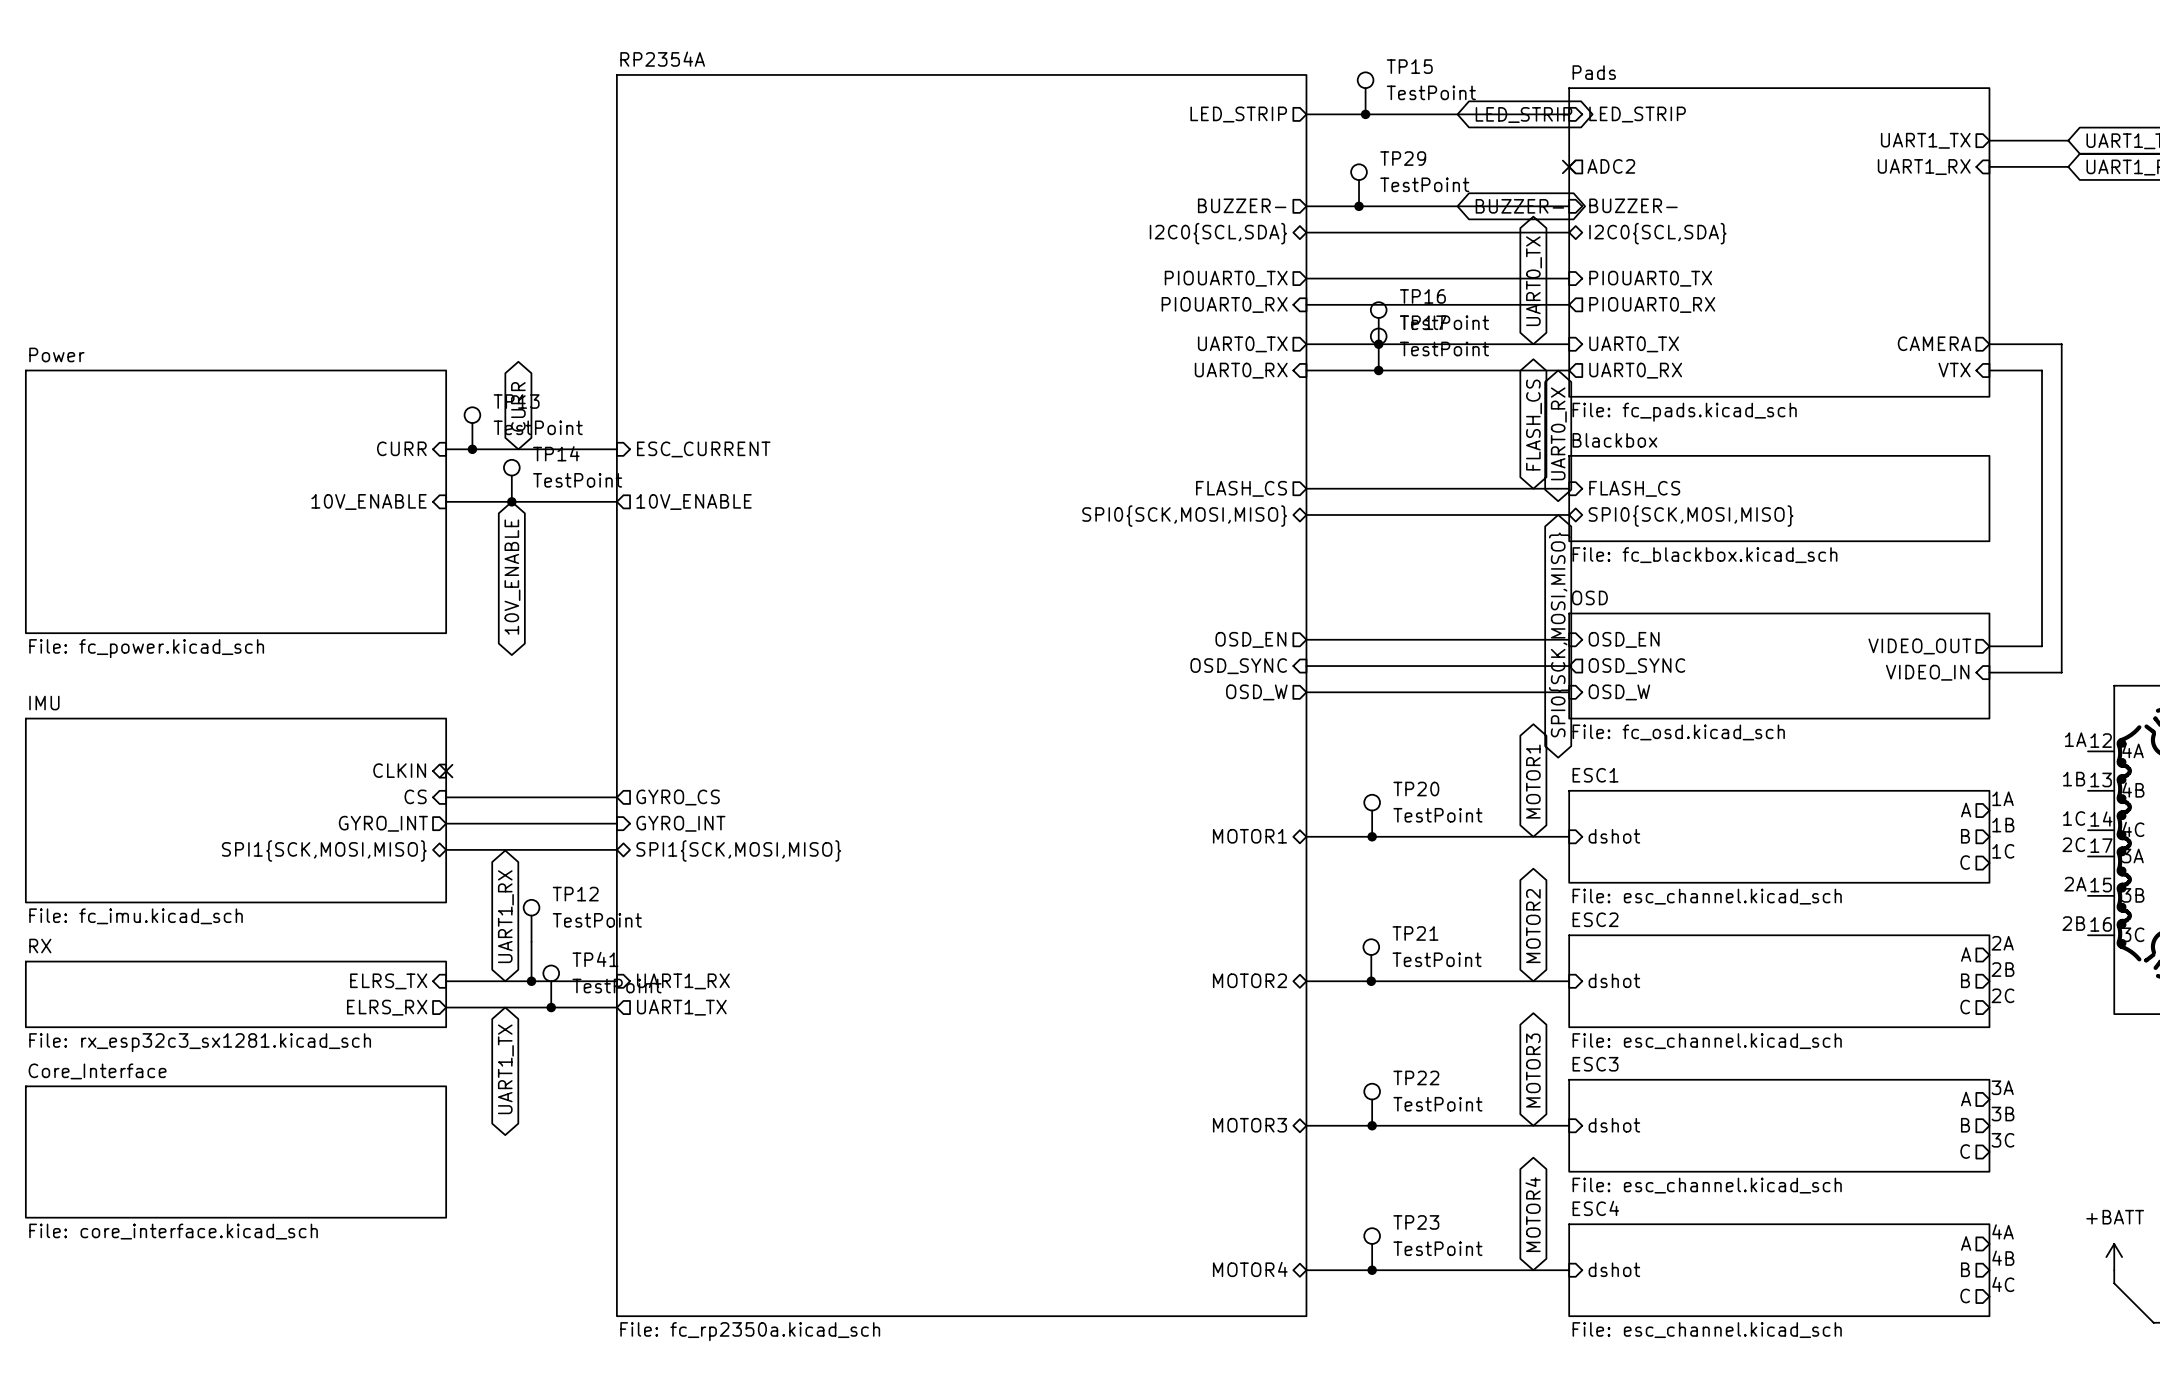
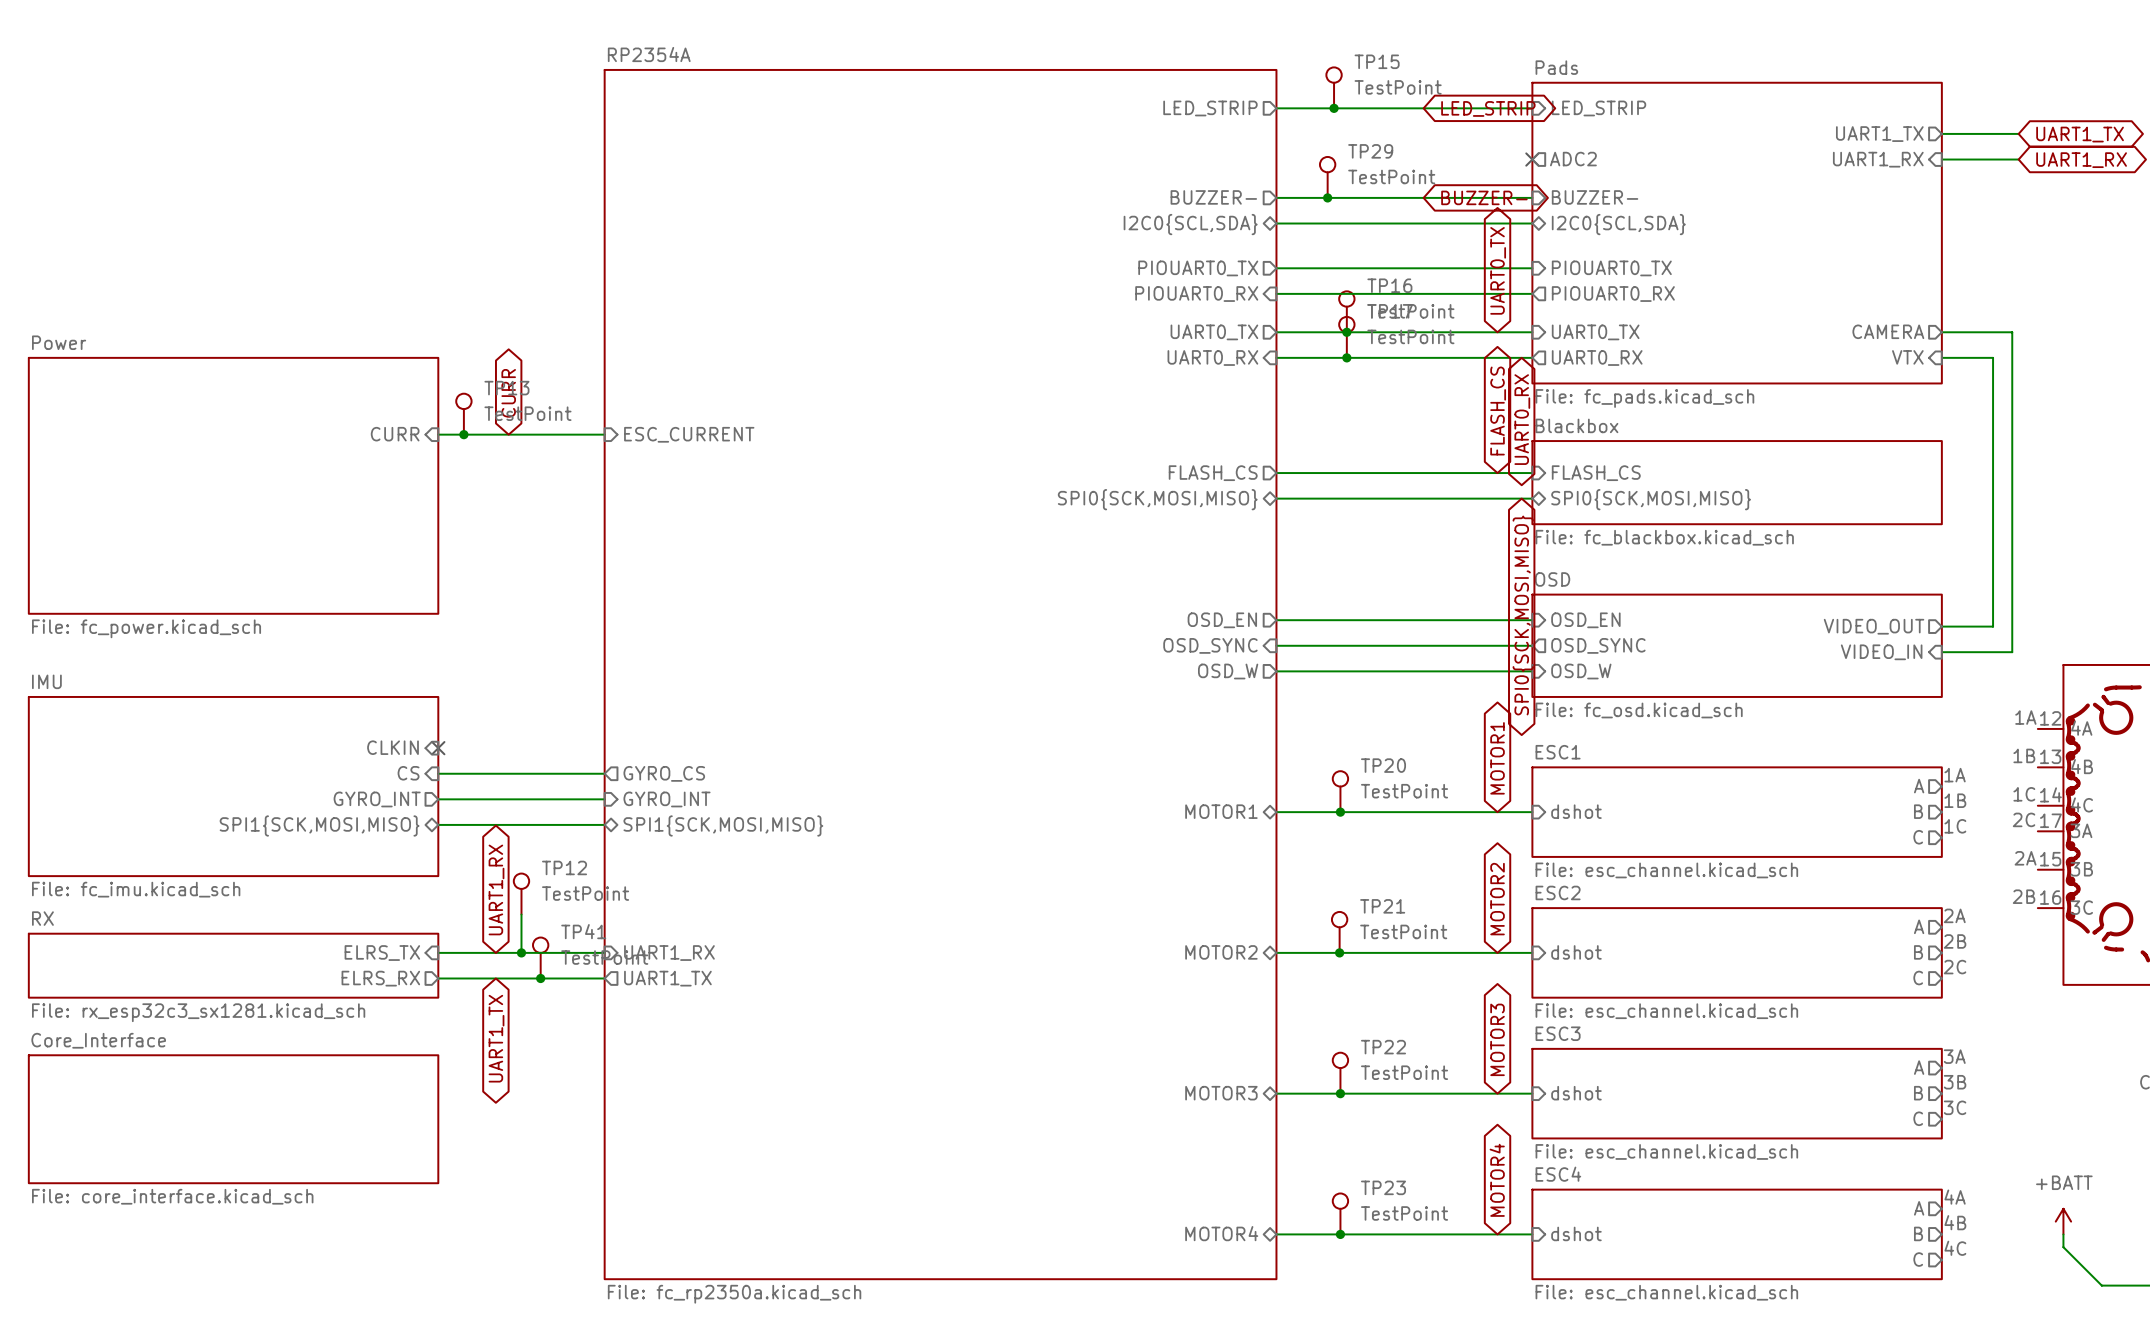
TP14: TestPoint (511, 480) -> none
sheet pin: 10V_ENABLE (369, 501) -> none
wire: (446, 501) (616, 501) -> none
junction: (511, 501) -> none
sheet pin: 10V_ENABLE (694, 501) -> none
global label: 10V_ENABLE (512, 577) -> none

